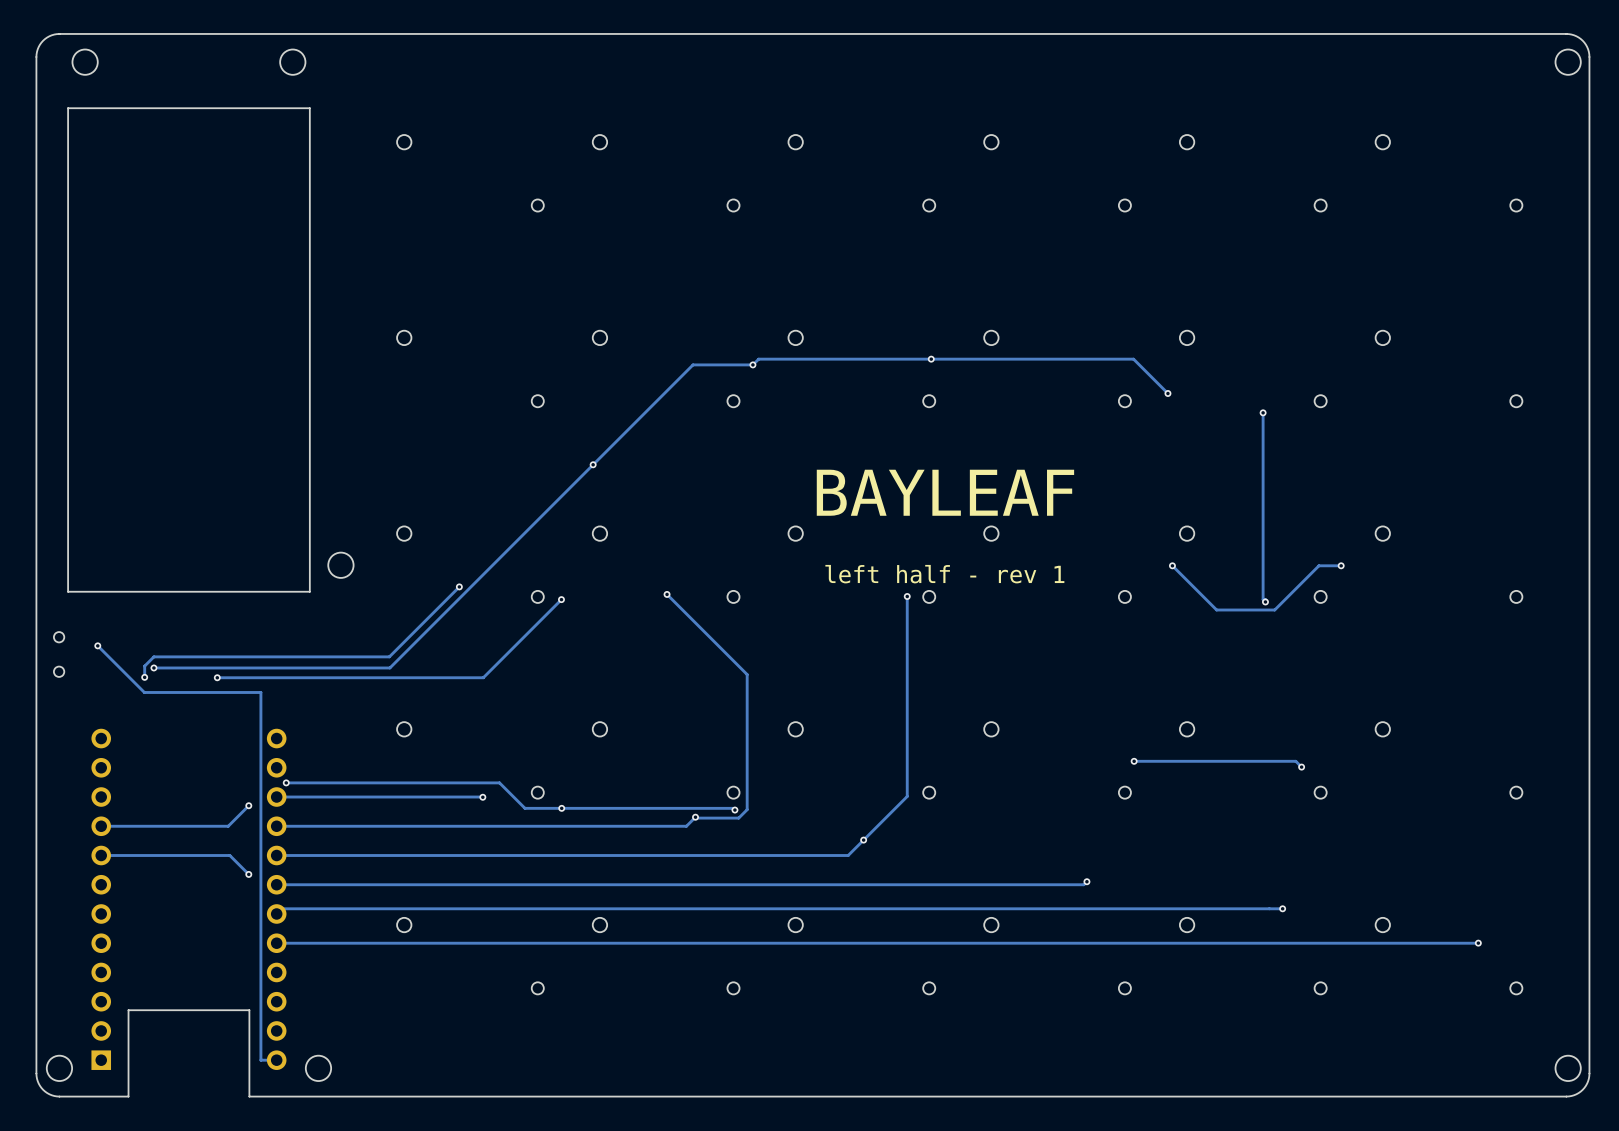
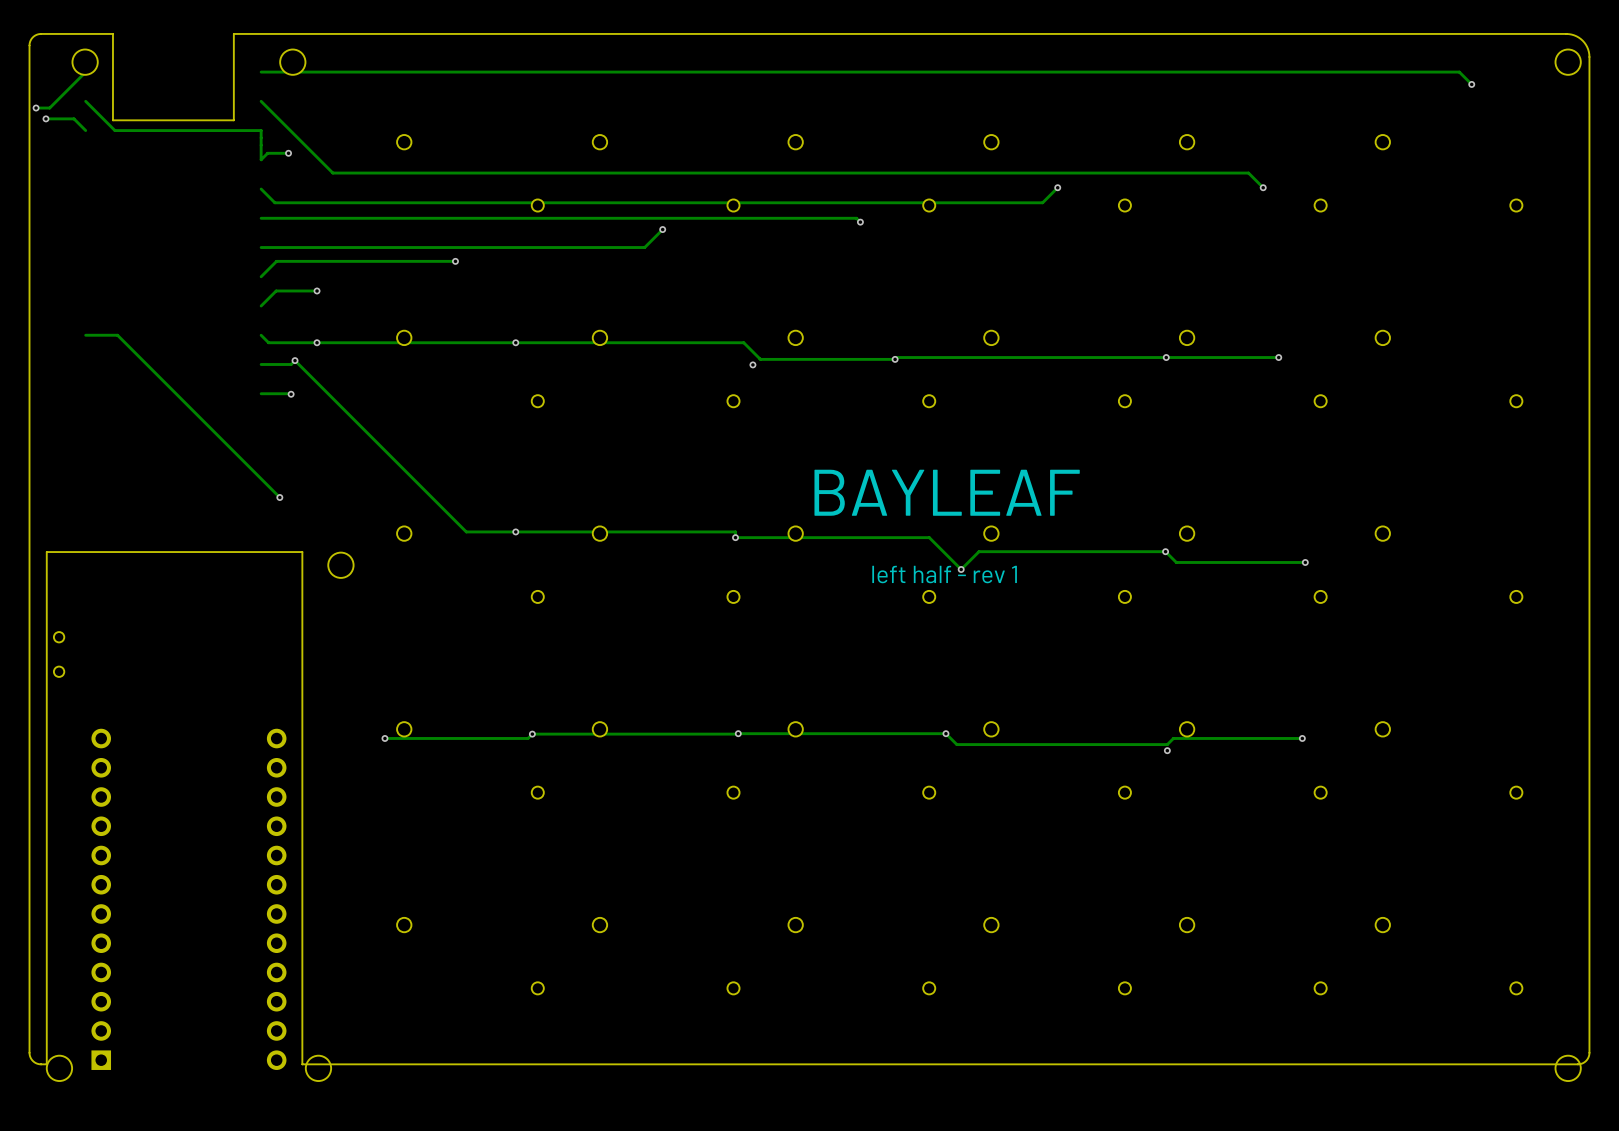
board edge: (59, 33) (49, 36) (43, 40) (38, 47) (36, 56) (36, 1073) (38, 1083) (47, 1093) (59, 1096) (128, 1096) (128, 1010) (249, 1010) (249, 1096) (1566, 1096) (1578, 1093) (1587, 1083) (1589, 1076) (1589, 1052) -> (59, 33) (37, 34) (32, 38) (29, 45) (29, 1052) (34, 1062) (46, 1064) (46, 552) (302, 552) (302, 1064) (1577, 1064) (1586, 1060) (1589, 1052)
board edge: (233, 33) (112, 33) -> (233, 33) (233, 120) (112, 120) (112, 33)
track: none -> (85, 72) (49, 108) (36, 108)
track: none -> (261, 72) (1459, 72) (1471, 84)
via: none -> (1471, 84)
track: none -> (85, 101) (114, 130) (261, 130) (261, 159) (267, 153) (288, 153)
track: none -> (261, 101) (332, 173) (1248, 173) (1263, 187)
via: none -> (36, 108)
board edge: (309, 108) (68, 108) (68, 591) (309, 591) (309, 108) -> none
track: none -> (45, 118) (74, 118) (85, 130)
via: none -> (45, 118)
via: none -> (288, 153)
track: none -> (1057, 187) (1042, 202) (274, 202) (261, 189)
via: none -> (1057, 187)
via: none -> (1263, 187)
track: none -> (261, 218) (856, 218) (860, 222)
via: none -> (860, 222)
track: none -> (662, 229) (644, 247) (261, 247)
via: none -> (662, 229)
track: none -> (455, 261) (276, 261) (261, 276)
via: none -> (455, 261)
track: none -> (317, 290) (276, 290) (261, 306)
via: none -> (317, 290)
track: none -> (85, 335) (117, 335) (279, 497)
track: none -> (261, 335) (268, 342) (743, 342) (760, 359) (1278, 357)
via: none -> (317, 342)
via: none -> (515, 342)
via: none -> (1278, 357)
via position: (931, 359) -> (895, 359)
via: none -> (295, 360)
track: none -> (261, 364) (291, 364) (295, 360) (466, 531) (735, 531) (735, 537) (929, 537) (961, 569) (979, 551) (1165, 551) (1176, 562) (1305, 562)
track: none -> (291, 393) (261, 393)
track: (1167, 393) (1133, 359) (758, 359) (752, 364) (693, 364) (389, 667) (153, 667) -> none
via position: (1167, 393) -> (1166, 357)
via: none -> (291, 394)
track: (1263, 412) (1263, 599) (1265, 601) (1265, 599) -> none
via: (1263, 412) -> none
via: (593, 464) -> none
via: none -> (279, 497)
via: none -> (515, 531)
via: none -> (735, 537)
via: none -> (1305, 562)
via position: (1172, 565) -> (1165, 551)
track: (1341, 565) (1318, 565) (1274, 610) (1216, 610) (1172, 565) -> none
via: (1341, 565) -> none
track: (459, 586) (389, 656) (153, 656) (144, 666) (144, 677) -> none
via: (459, 586) -> none
track: (667, 594) (747, 674) (747, 809) (738, 818) (695, 817) (686, 826) (276, 826) -> none
via: (667, 594) -> none
track: (907, 596) (907, 796) (848, 855) (276, 855) -> none
via position: (907, 596) -> (961, 569)
track: (561, 599) (483, 677) (217, 677) -> none
via: (561, 599) -> none
via: (1265, 601) -> none
track: (97, 645) (144, 692) (260, 692) (260, 1060) (276, 1060) -> none
via: (97, 645) -> none
via: (153, 667) -> none
via: (144, 677) -> none
via: (217, 677) -> none
via: none -> (738, 733)
via: none -> (945, 733)
via: none -> (532, 734)
via: none -> (384, 738)
track: none -> (1302, 738) (1173, 738) (1167, 744) (956, 744) (945, 733) (532, 734) (528, 738) (384, 738)
track: (1134, 761) (1295, 761) (1301, 767) -> none
via position: (1134, 761) -> (1167, 750)
via position: (1301, 767) -> (1302, 738)
track: (286, 782) (499, 782) (525, 808) (733, 808) (734, 810) -> none
via: (286, 782) -> none
track: (276, 797) (482, 797) -> none
via: (482, 797) -> none
track: (248, 805) (228, 826) (101, 826) -> none
via: (248, 805) -> none
via: (561, 808) -> none
via: (734, 810) -> none
via: (695, 817) -> none
via: (863, 840) -> none
track: (101, 855) (229, 855) (248, 874) -> none
via: (248, 874) -> none
track: (1086, 881) (1083, 884) (276, 884) -> none
via: (1086, 881) -> none
track: (1282, 908) (281, 908) (276, 913) -> none
via: (1282, 908) -> none
track: (1478, 943) (276, 943) -> none
via: (1478, 943) -> none

